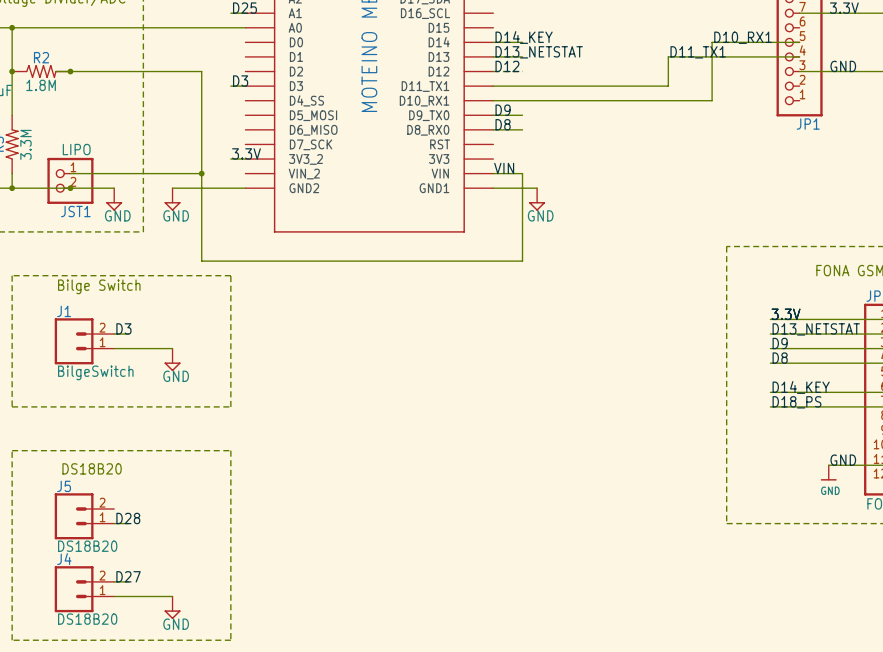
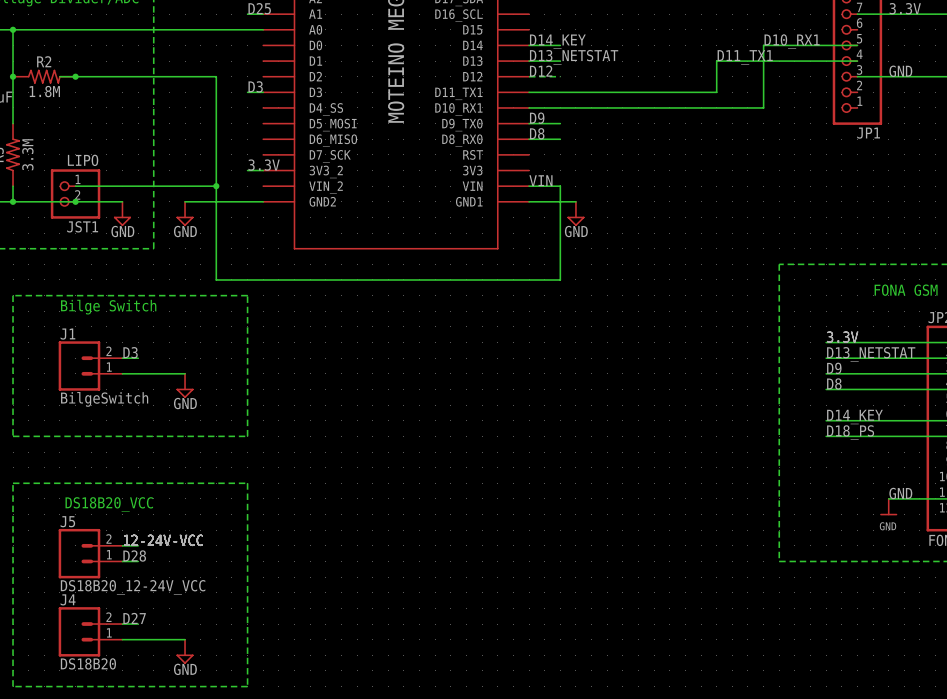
text: DS18B20 (92, 468) -> DS18B20_VCC (109, 504)
label: none -> 12-24V-VCC (163, 540)
wire: none -> (122, 545) (138, 545)
J5 value: DS18B20 (87, 546) -> DS18B20_12-24V_VCC (133, 587)

